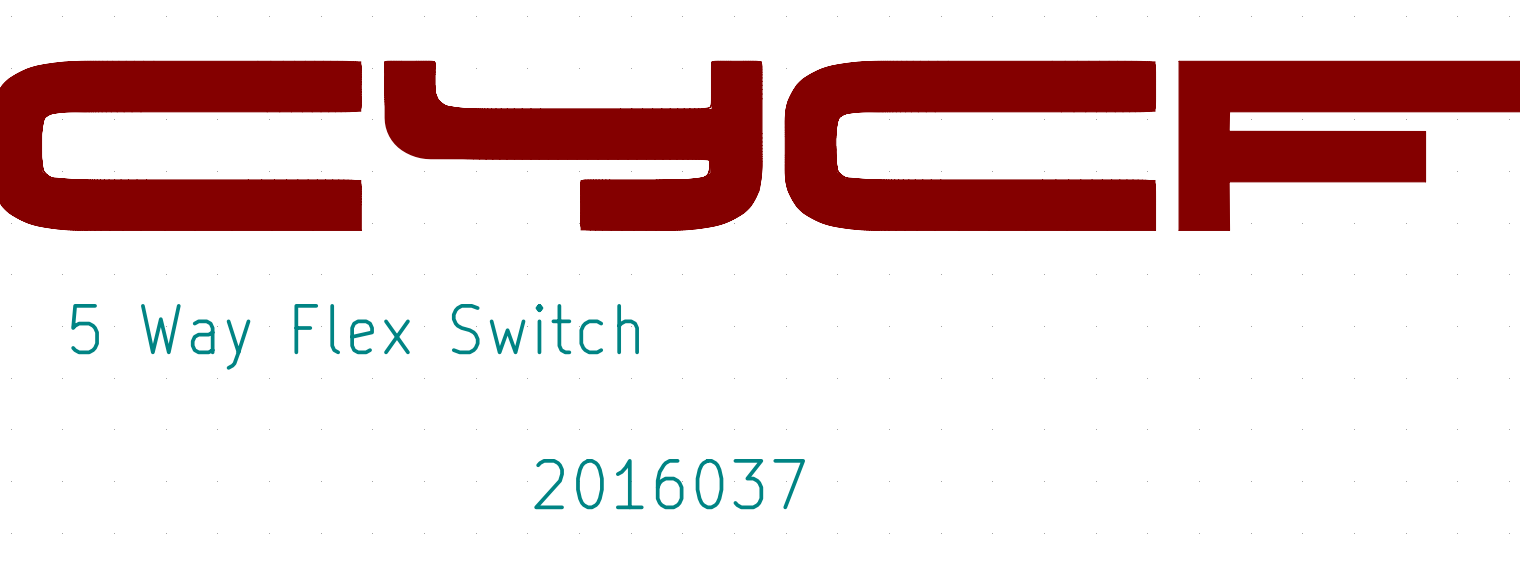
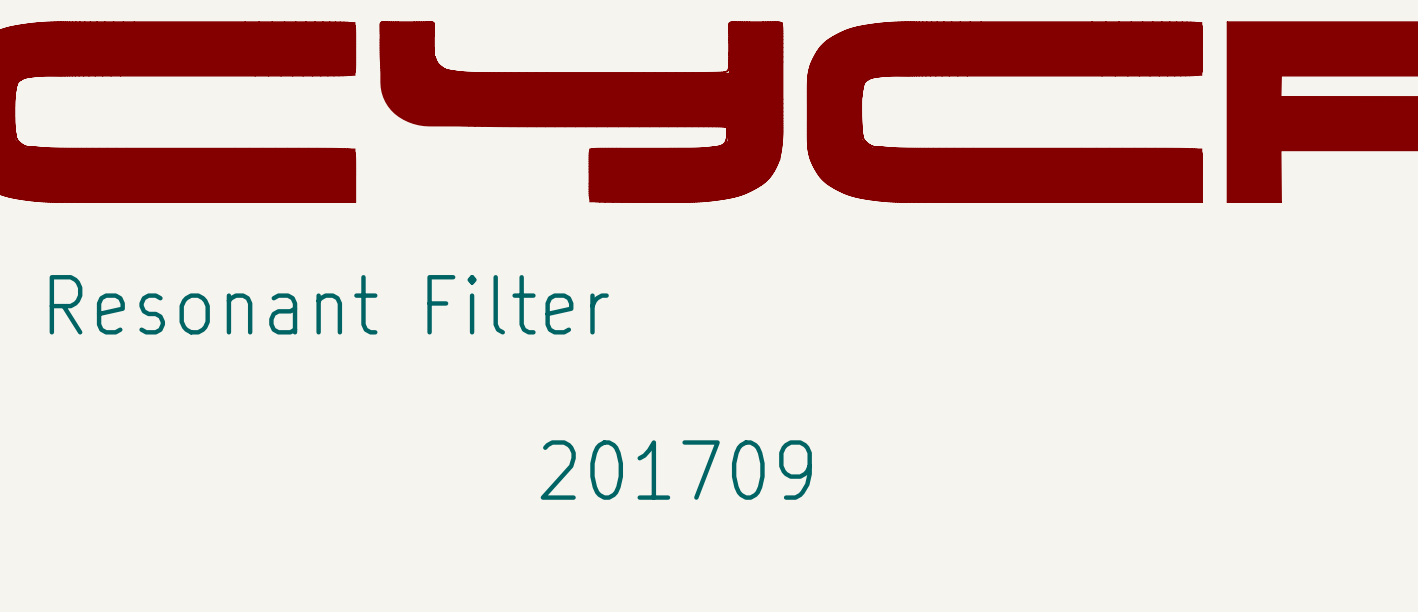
text: 5 Way Flex Switch (355, 336) -> Resonant Filter (329, 304)
text: 2016037 (669, 484) -> 201709 (676, 470)

